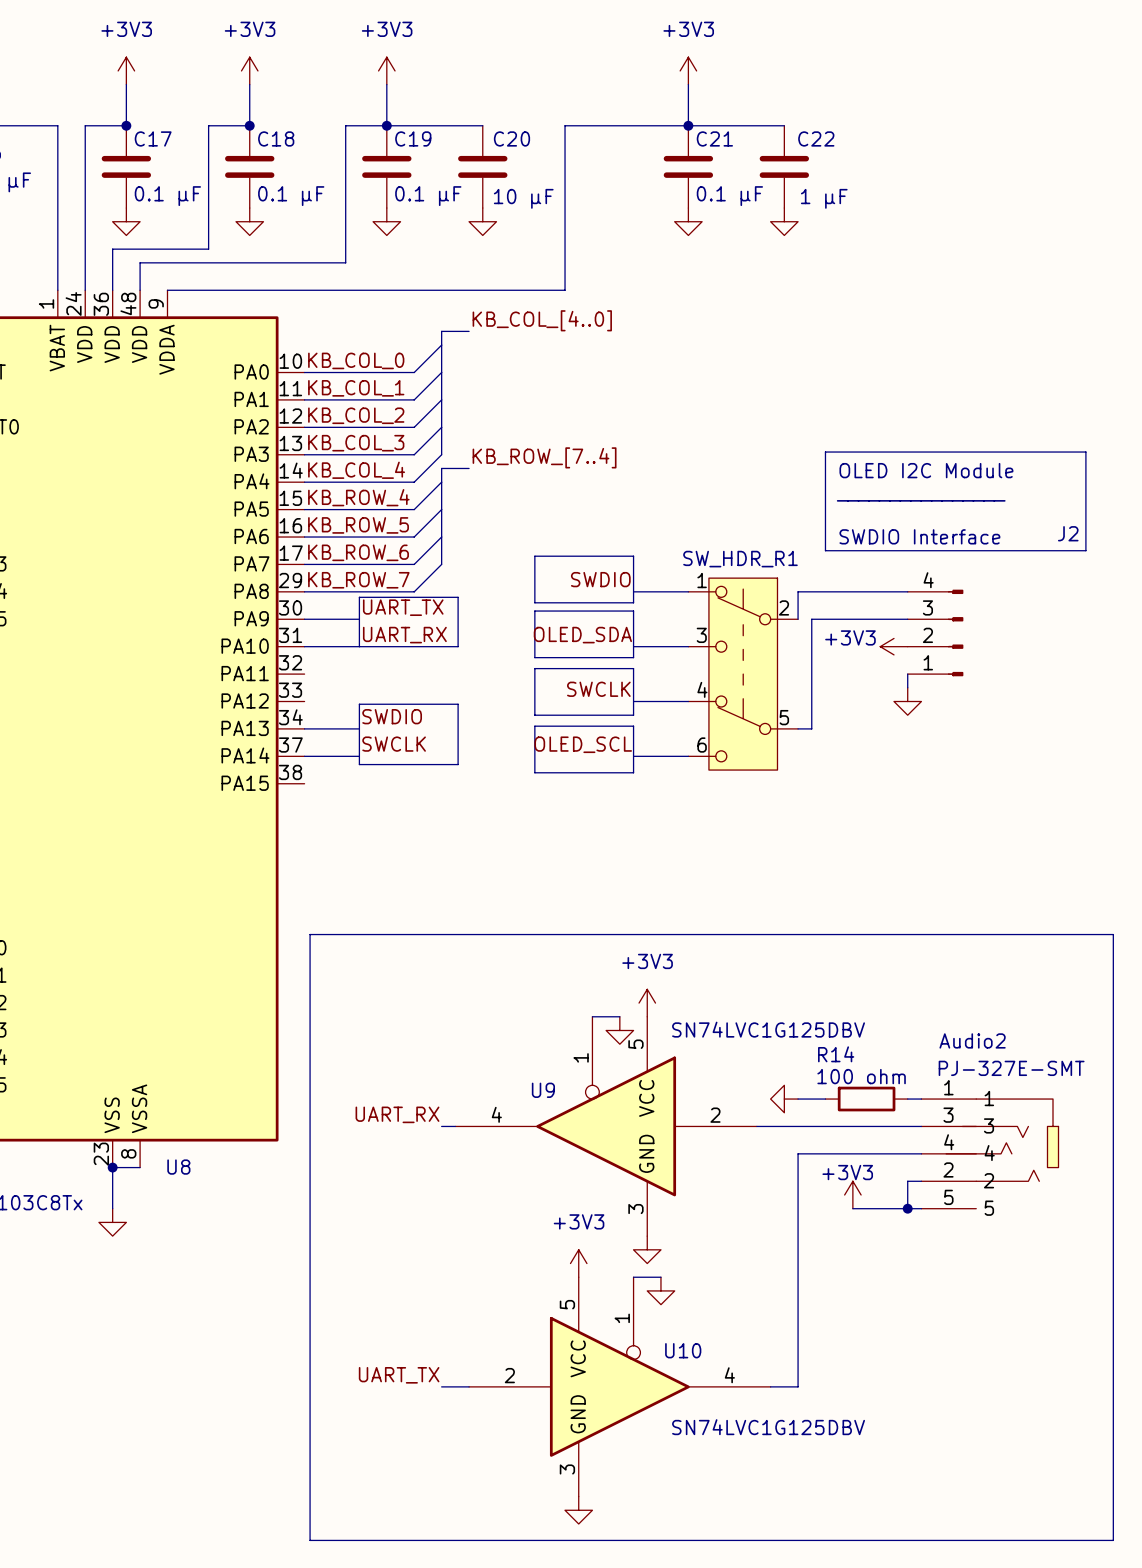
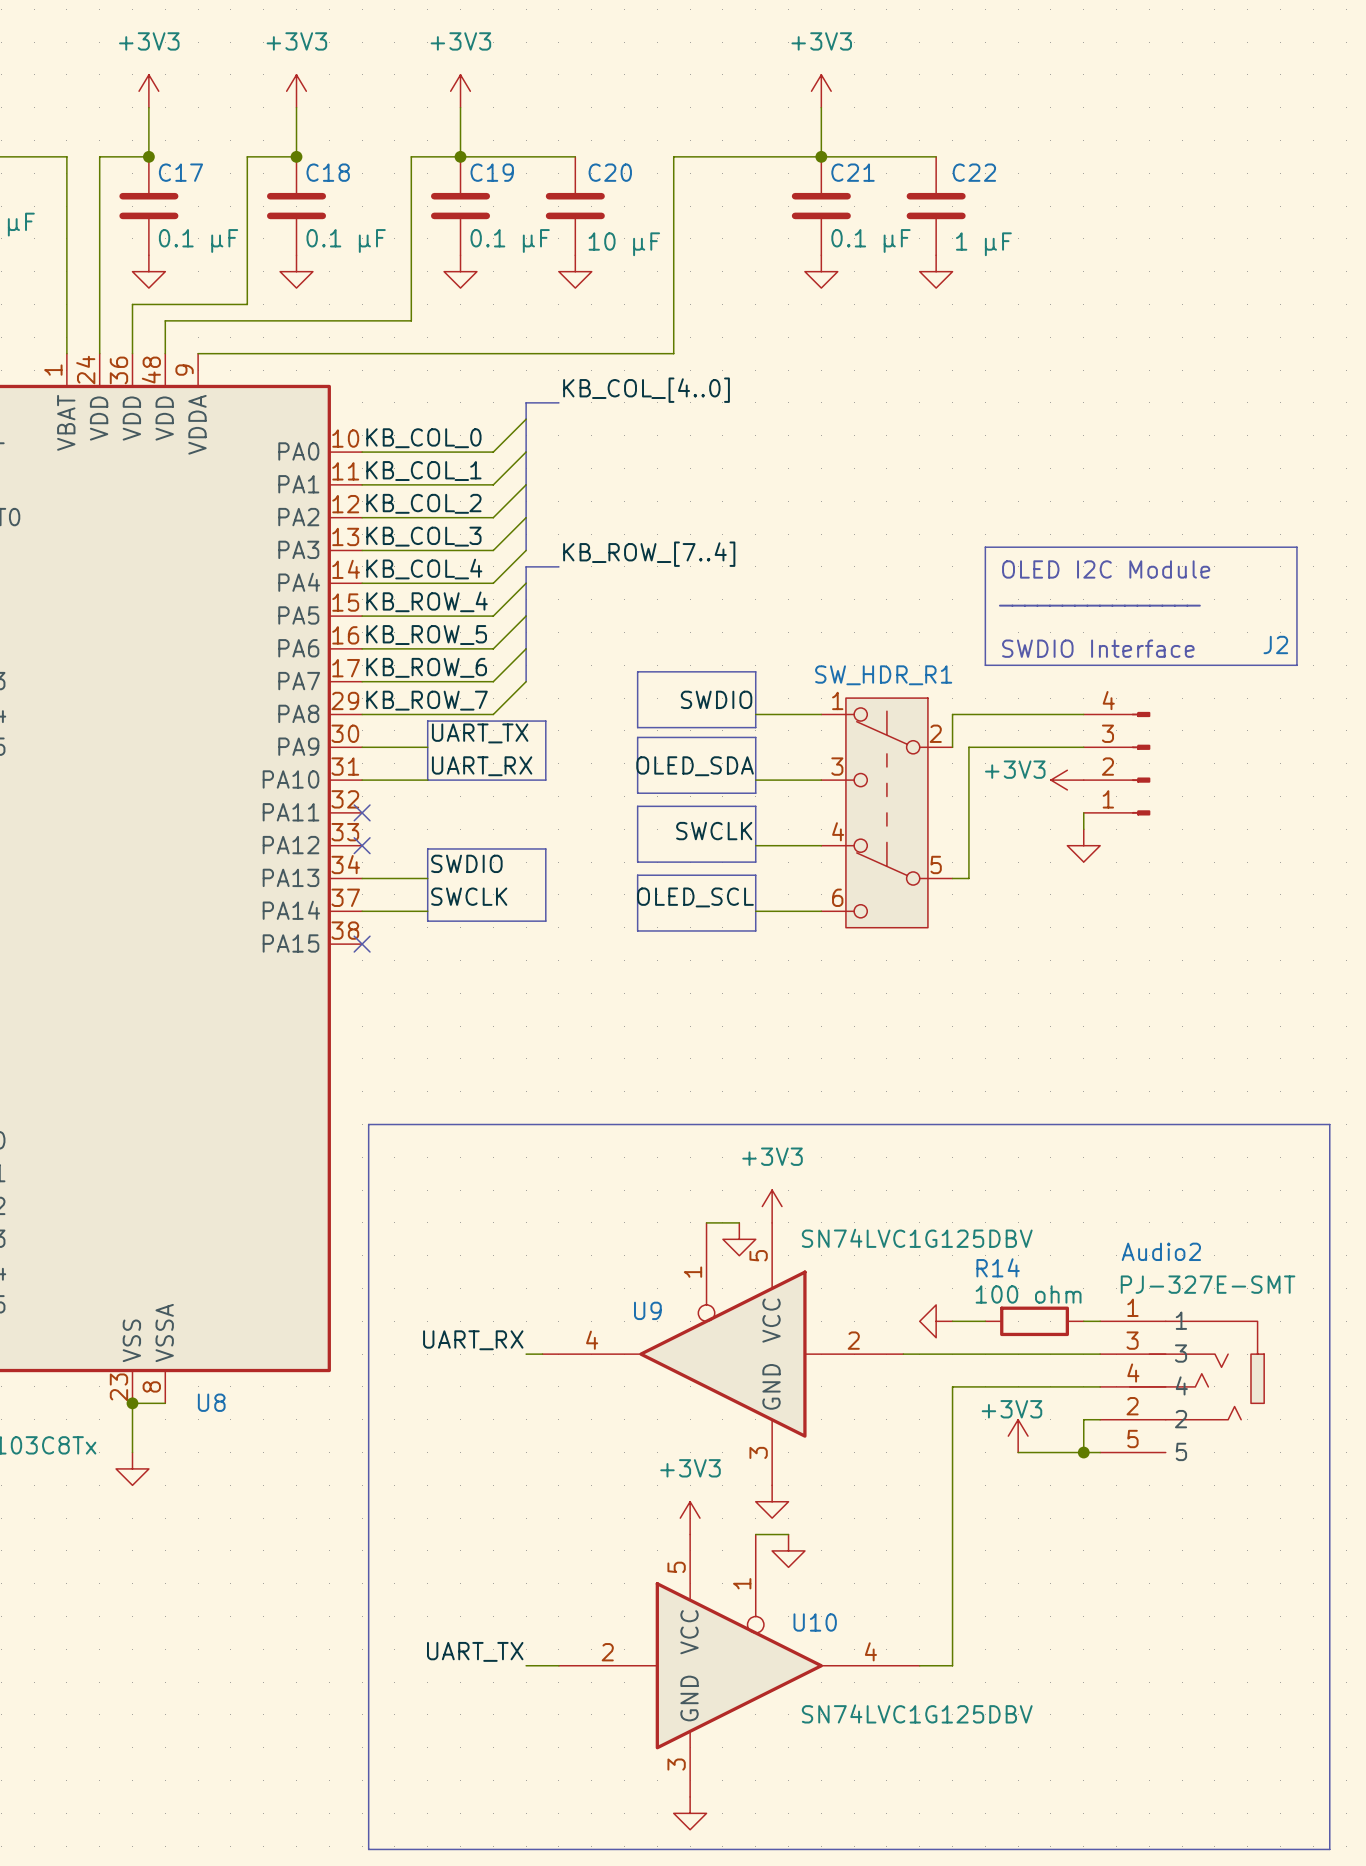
no-connect mark: none -> (362, 812)
no-connect mark: none -> (362, 845)
no-connect mark: none -> (362, 944)

